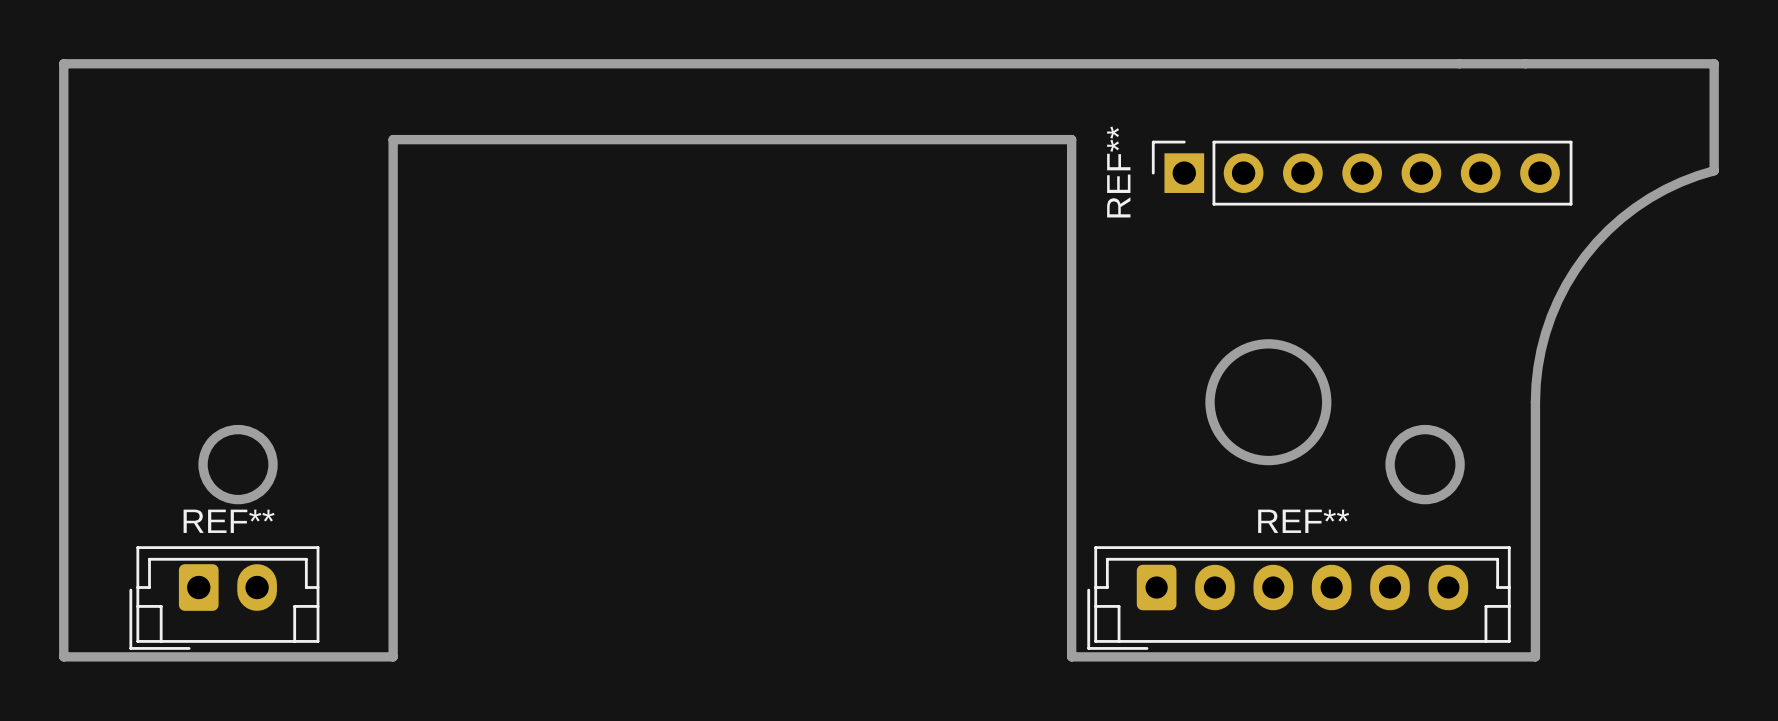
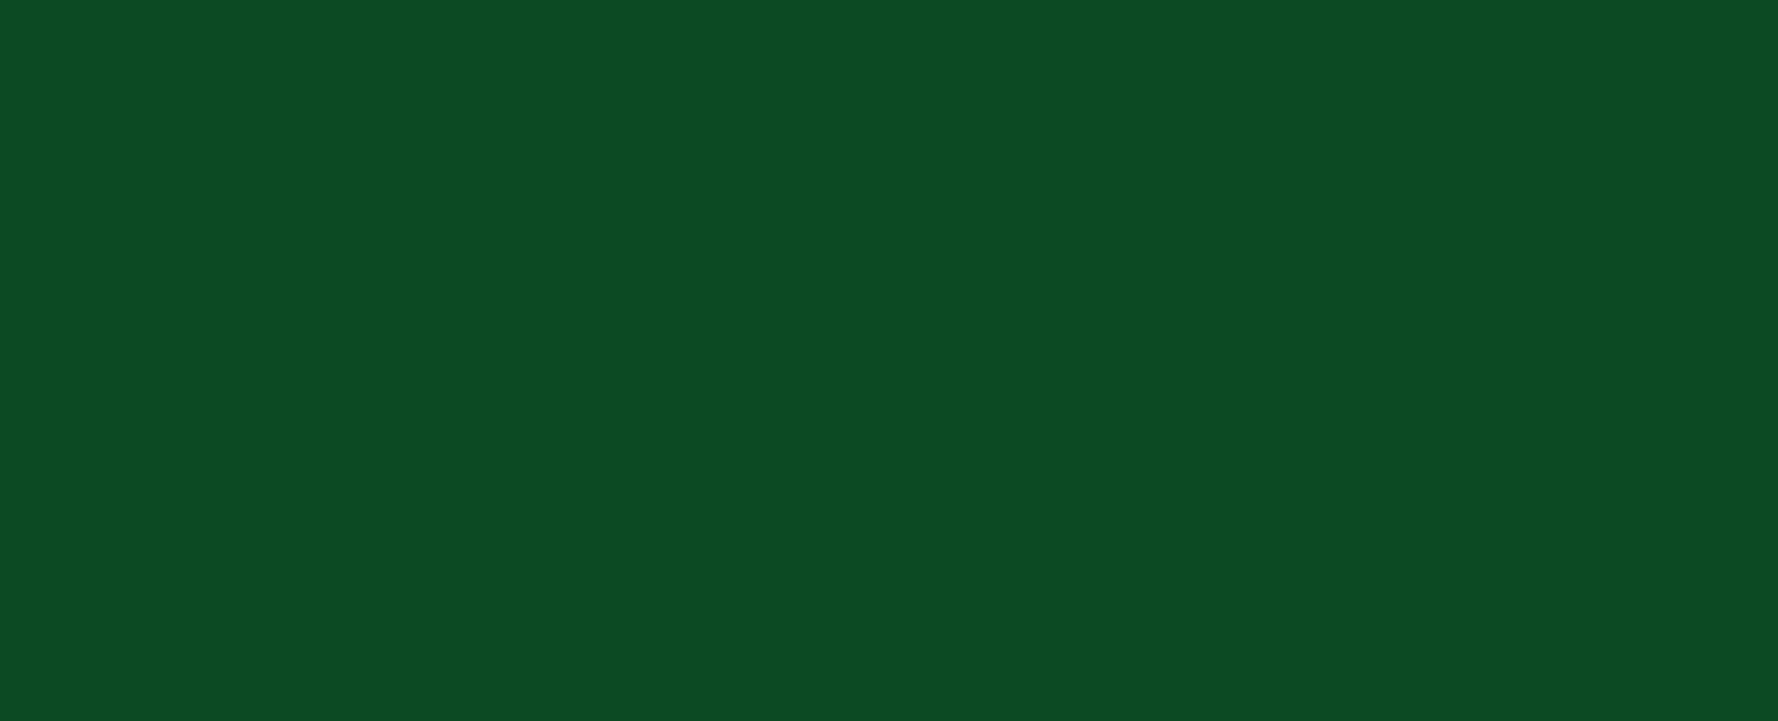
board edge: (63, 63) (1714, 63) (1714, 170) (1665, 189) (1621, 218) (1596, 242) (1575, 270) (1551, 316) (1541, 350) (1536, 384) (1535, 656) (1071, 656) (1071, 139) (393, 139) (393, 656) (63, 656) (63, 63) -> none
REF**: (1362, 173) -> none
round board edge: [1205, 339, 1332, 466] -> none
round board edge: [198, 424, 278, 505] -> none
round board edge: [1385, 424, 1465, 505] -> none
REF**: (224, 598) -> none
REF**: (1298, 598) -> none

